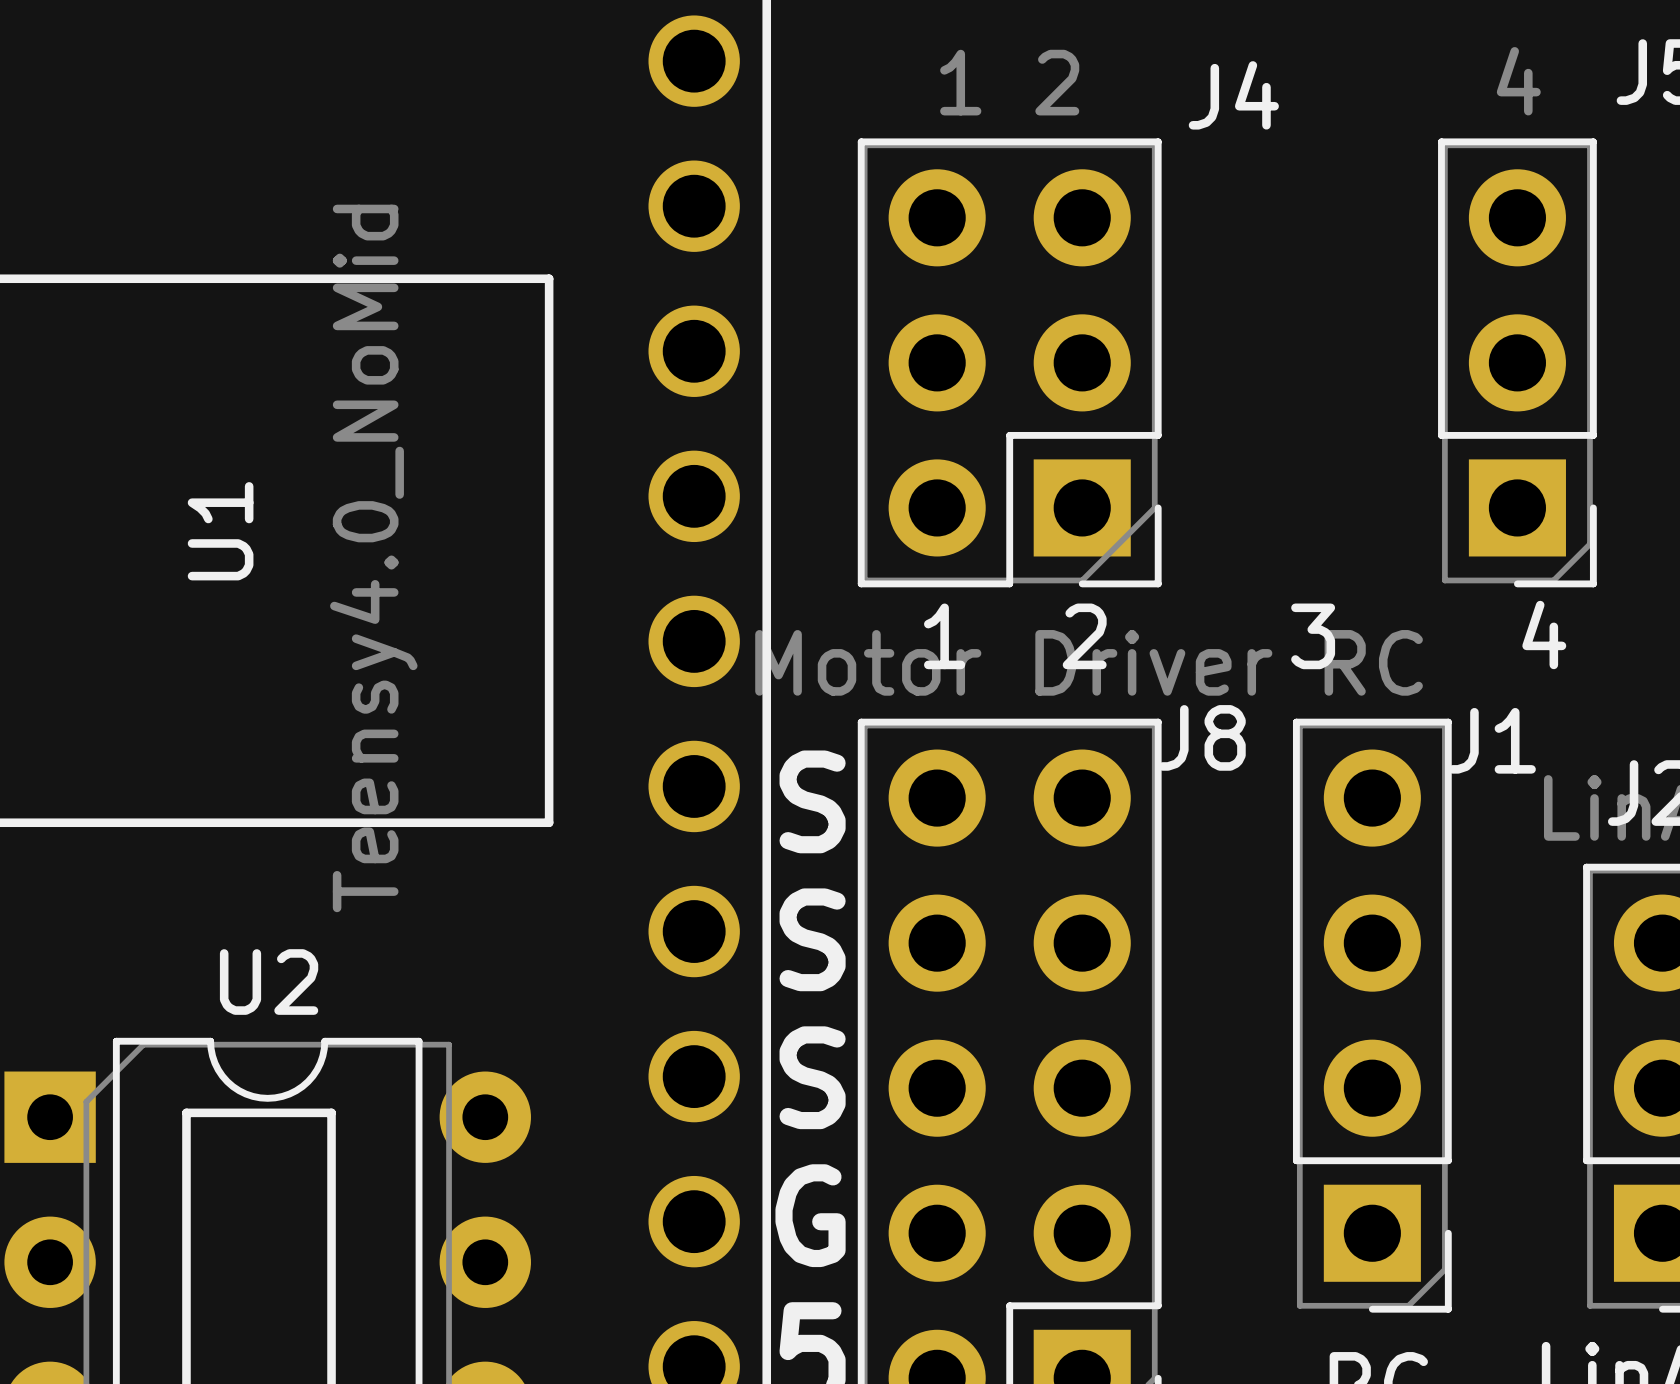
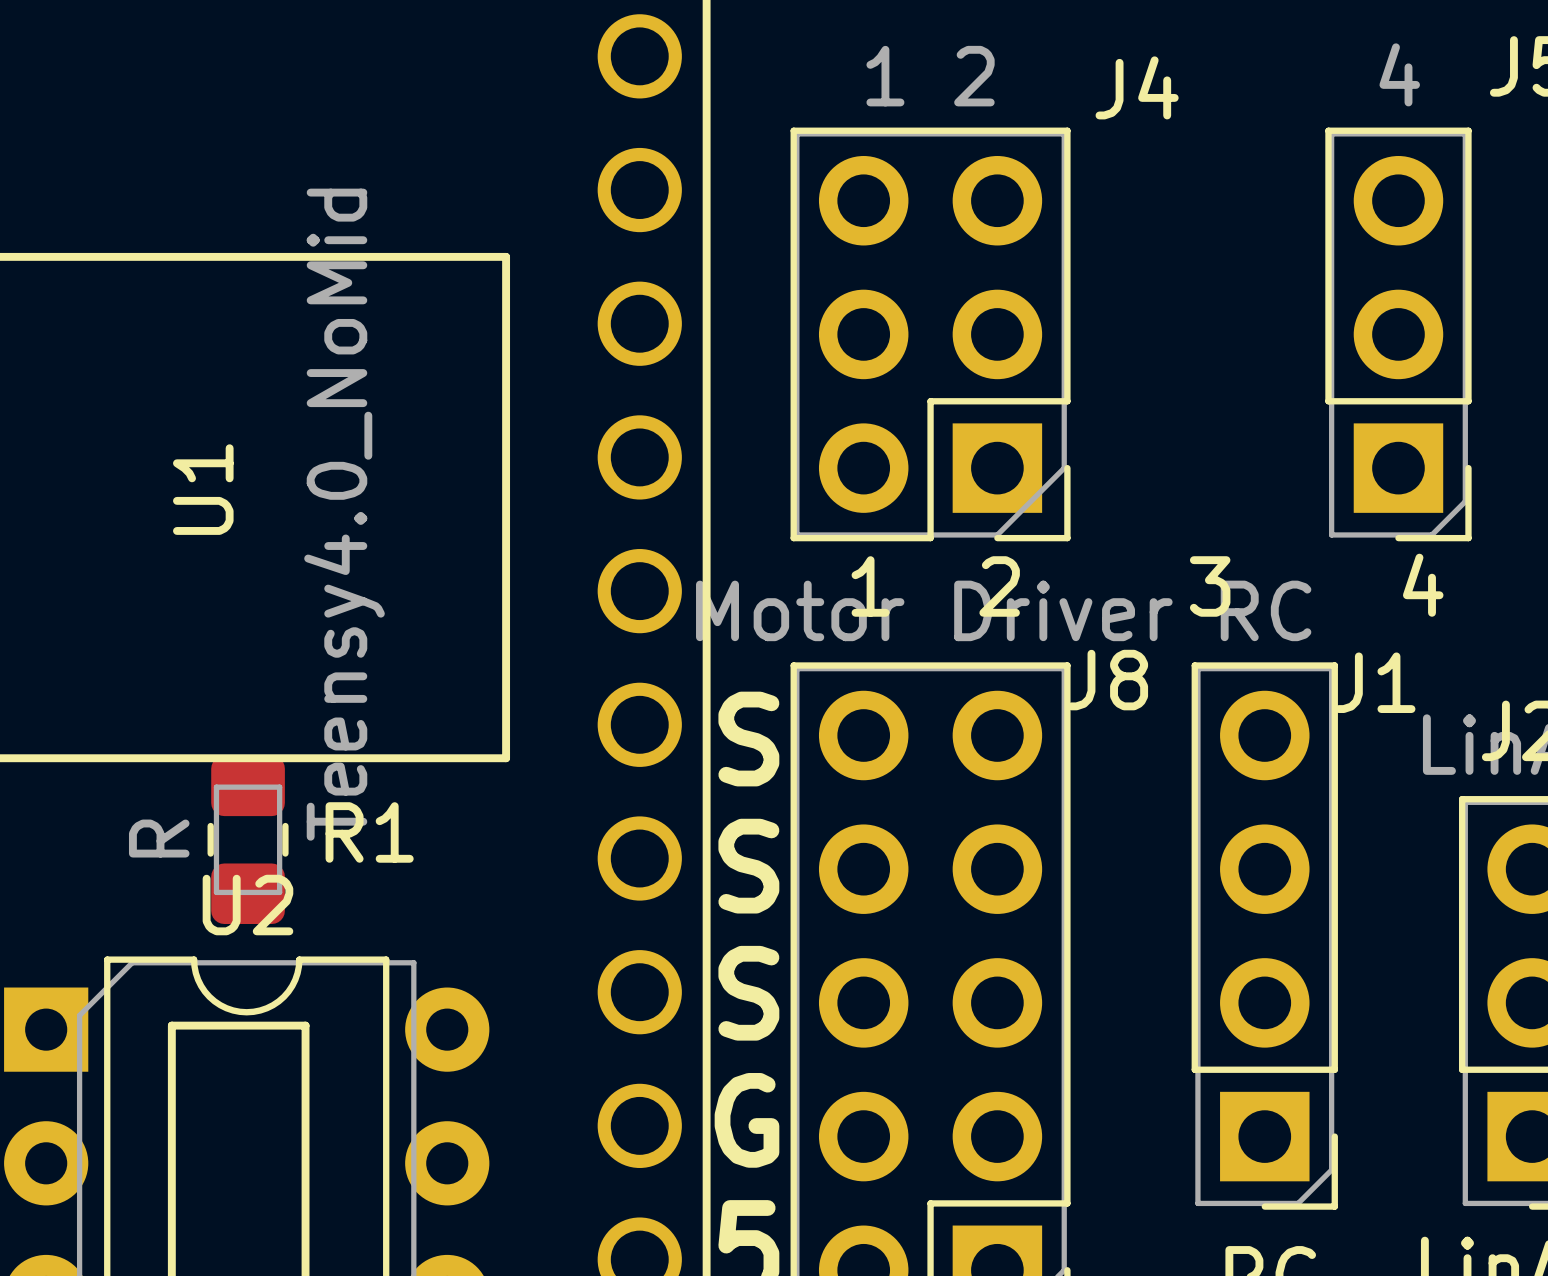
R1: none -> R (248, 839)

